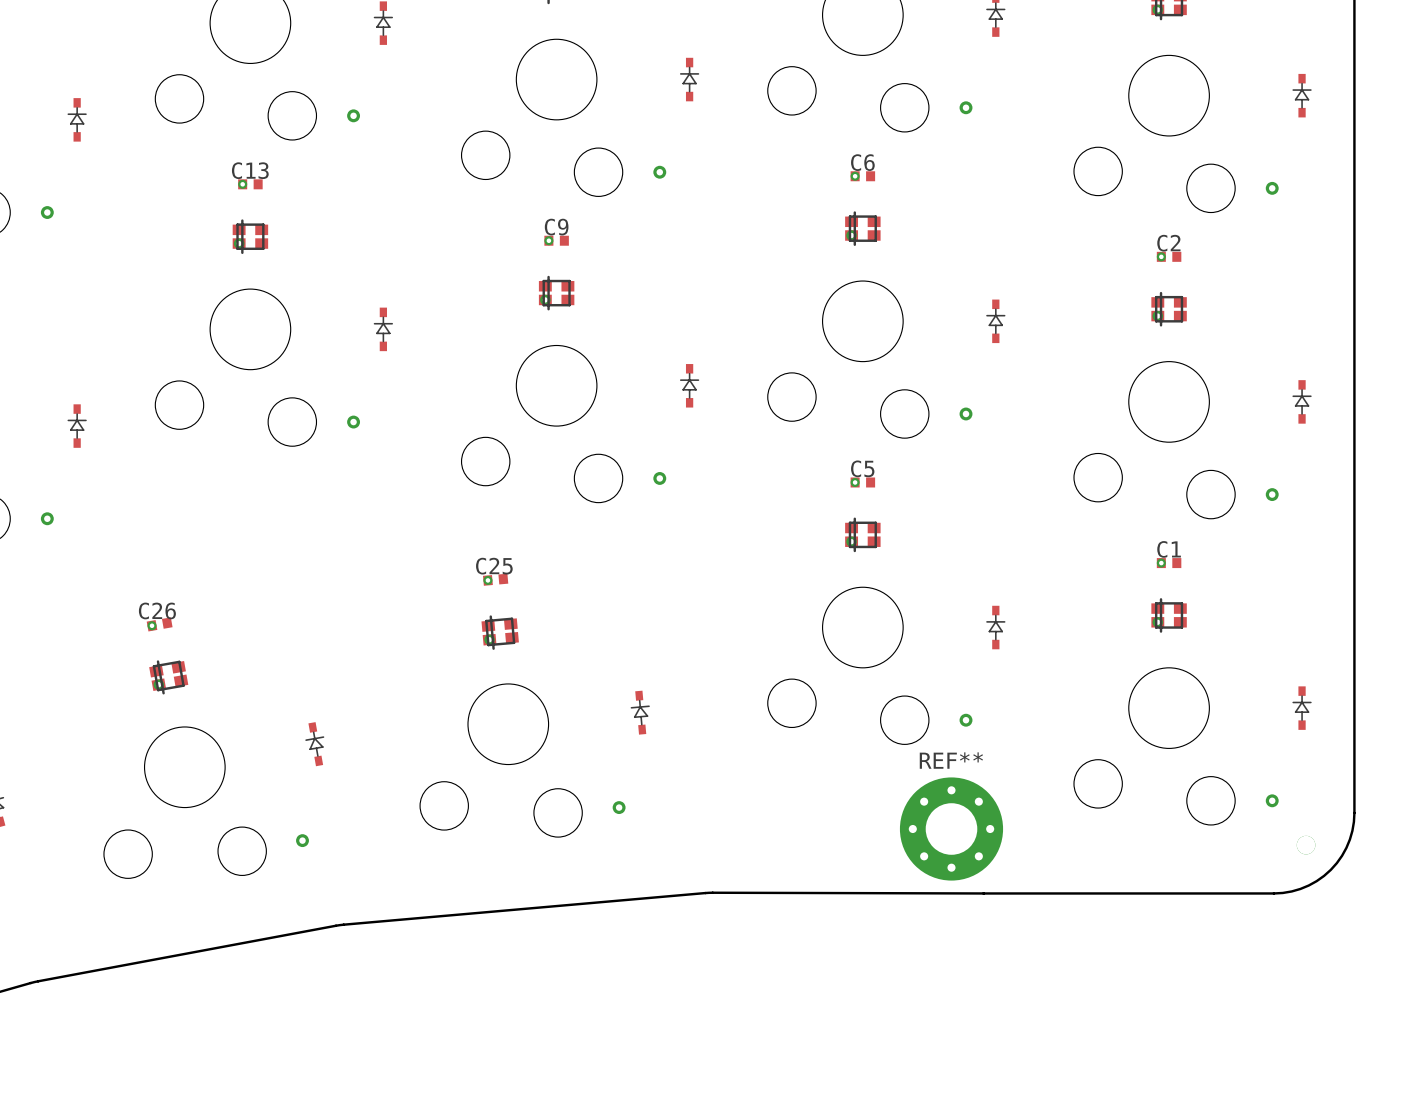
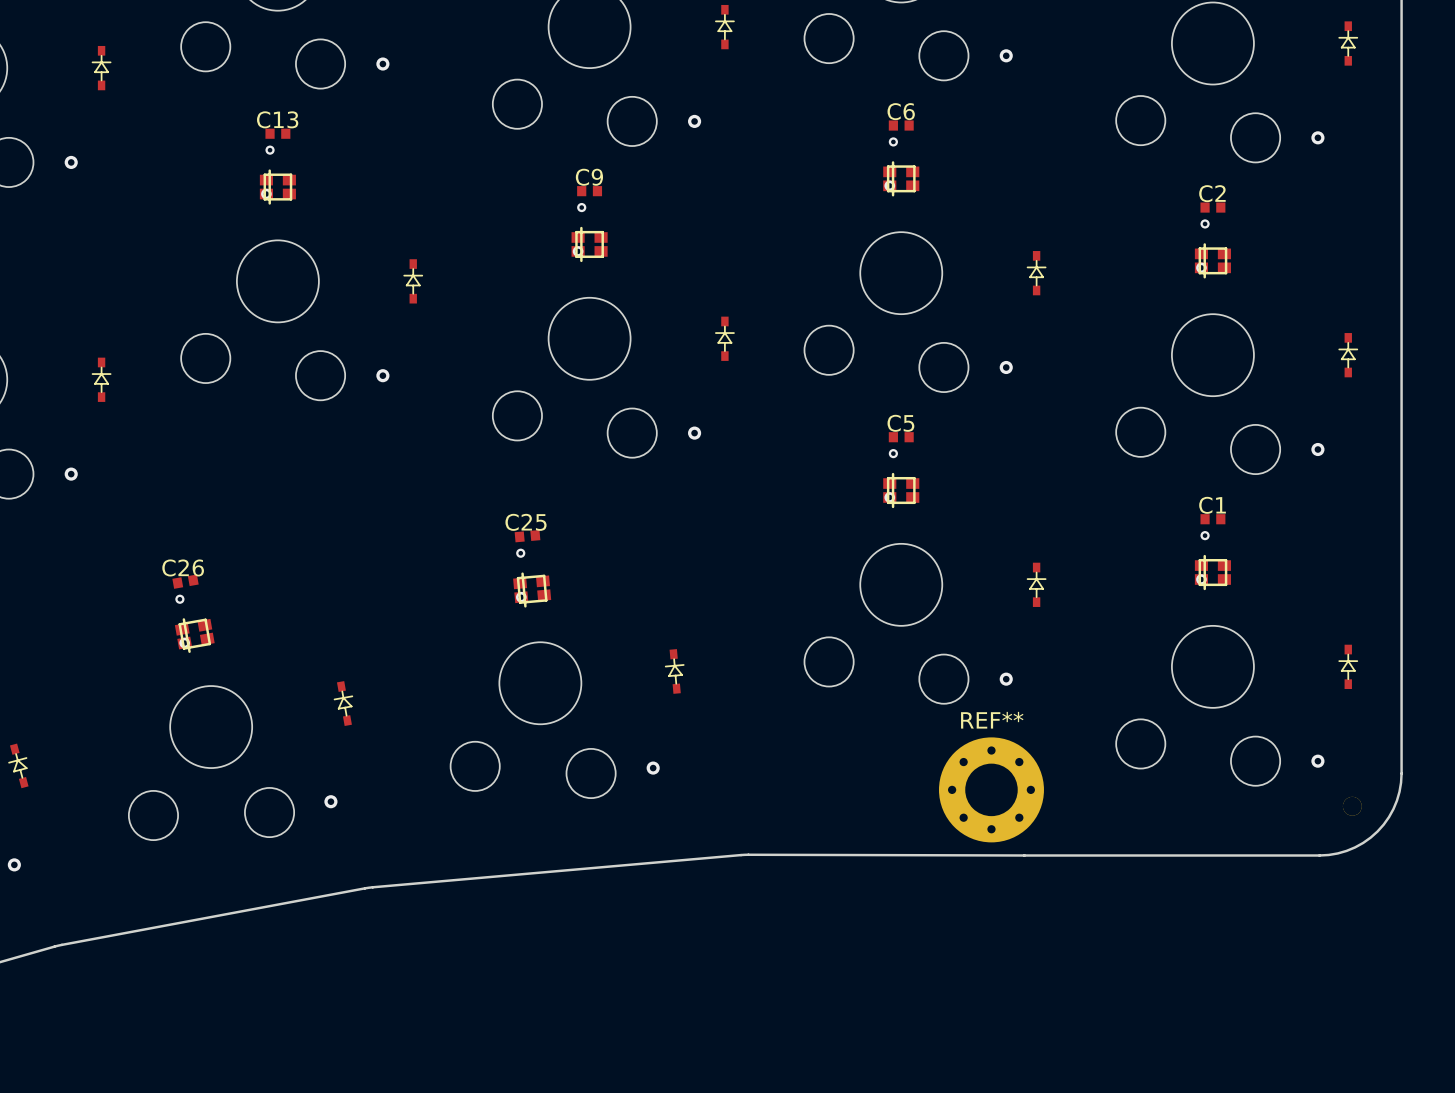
via position: (855, 176) -> (893, 141)
via position: (242, 184) -> (270, 150)
via position: (548, 240) -> (581, 207)
via position: (1161, 256) -> (1205, 223)
via position: (855, 482) -> (893, 453)
via position: (1161, 563) -> (1205, 535)
via position: (487, 580) -> (520, 553)
via position: (152, 625) -> (179, 599)

